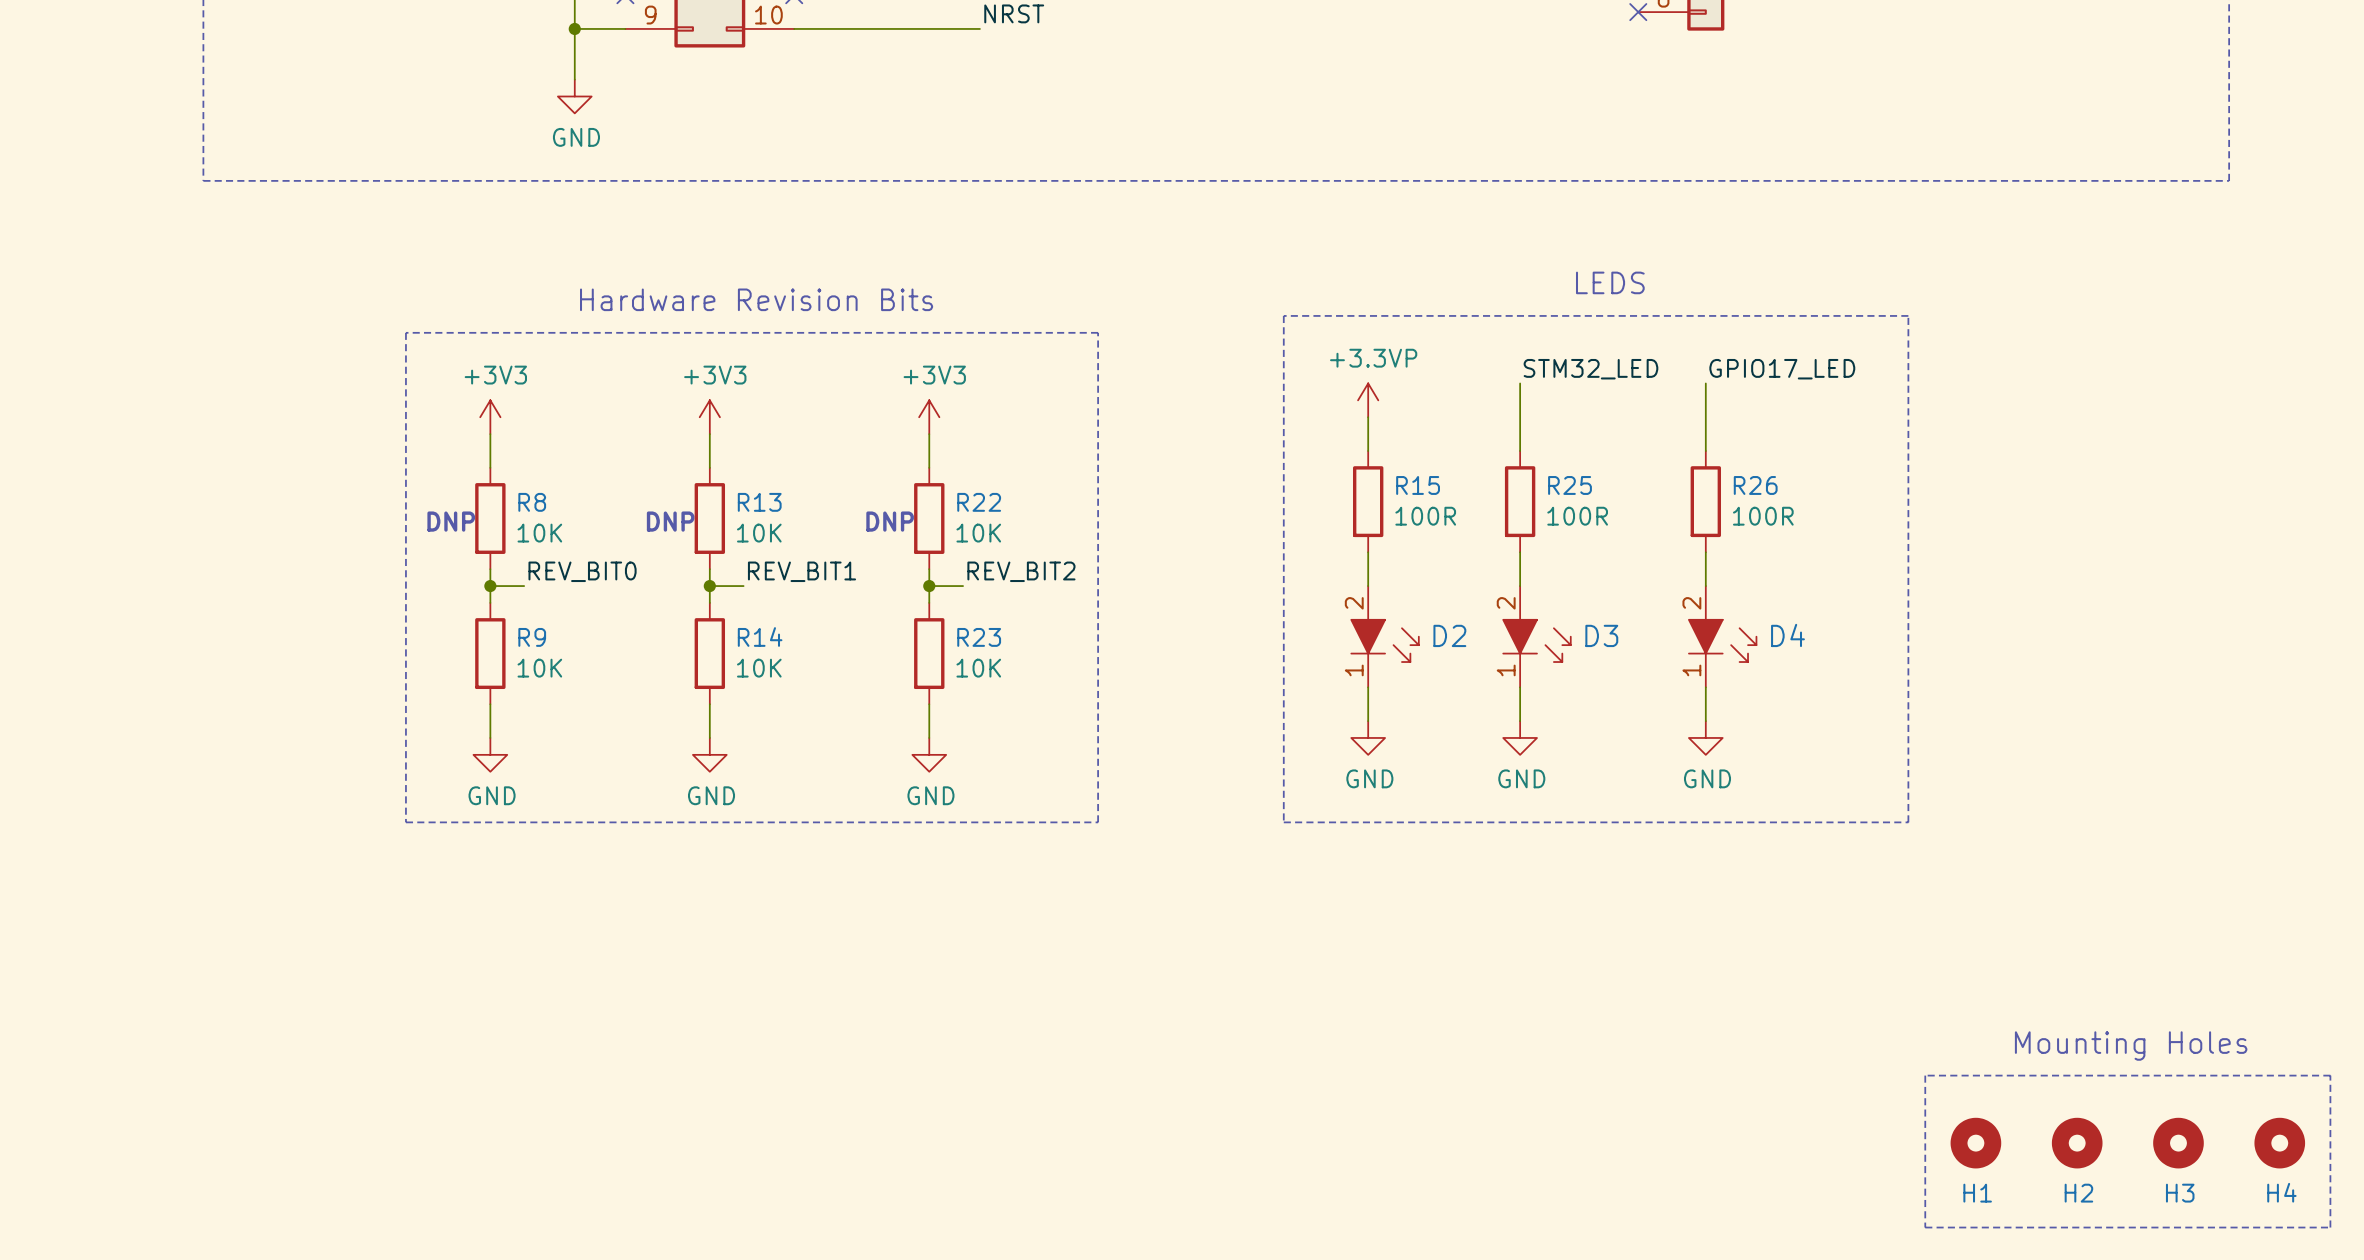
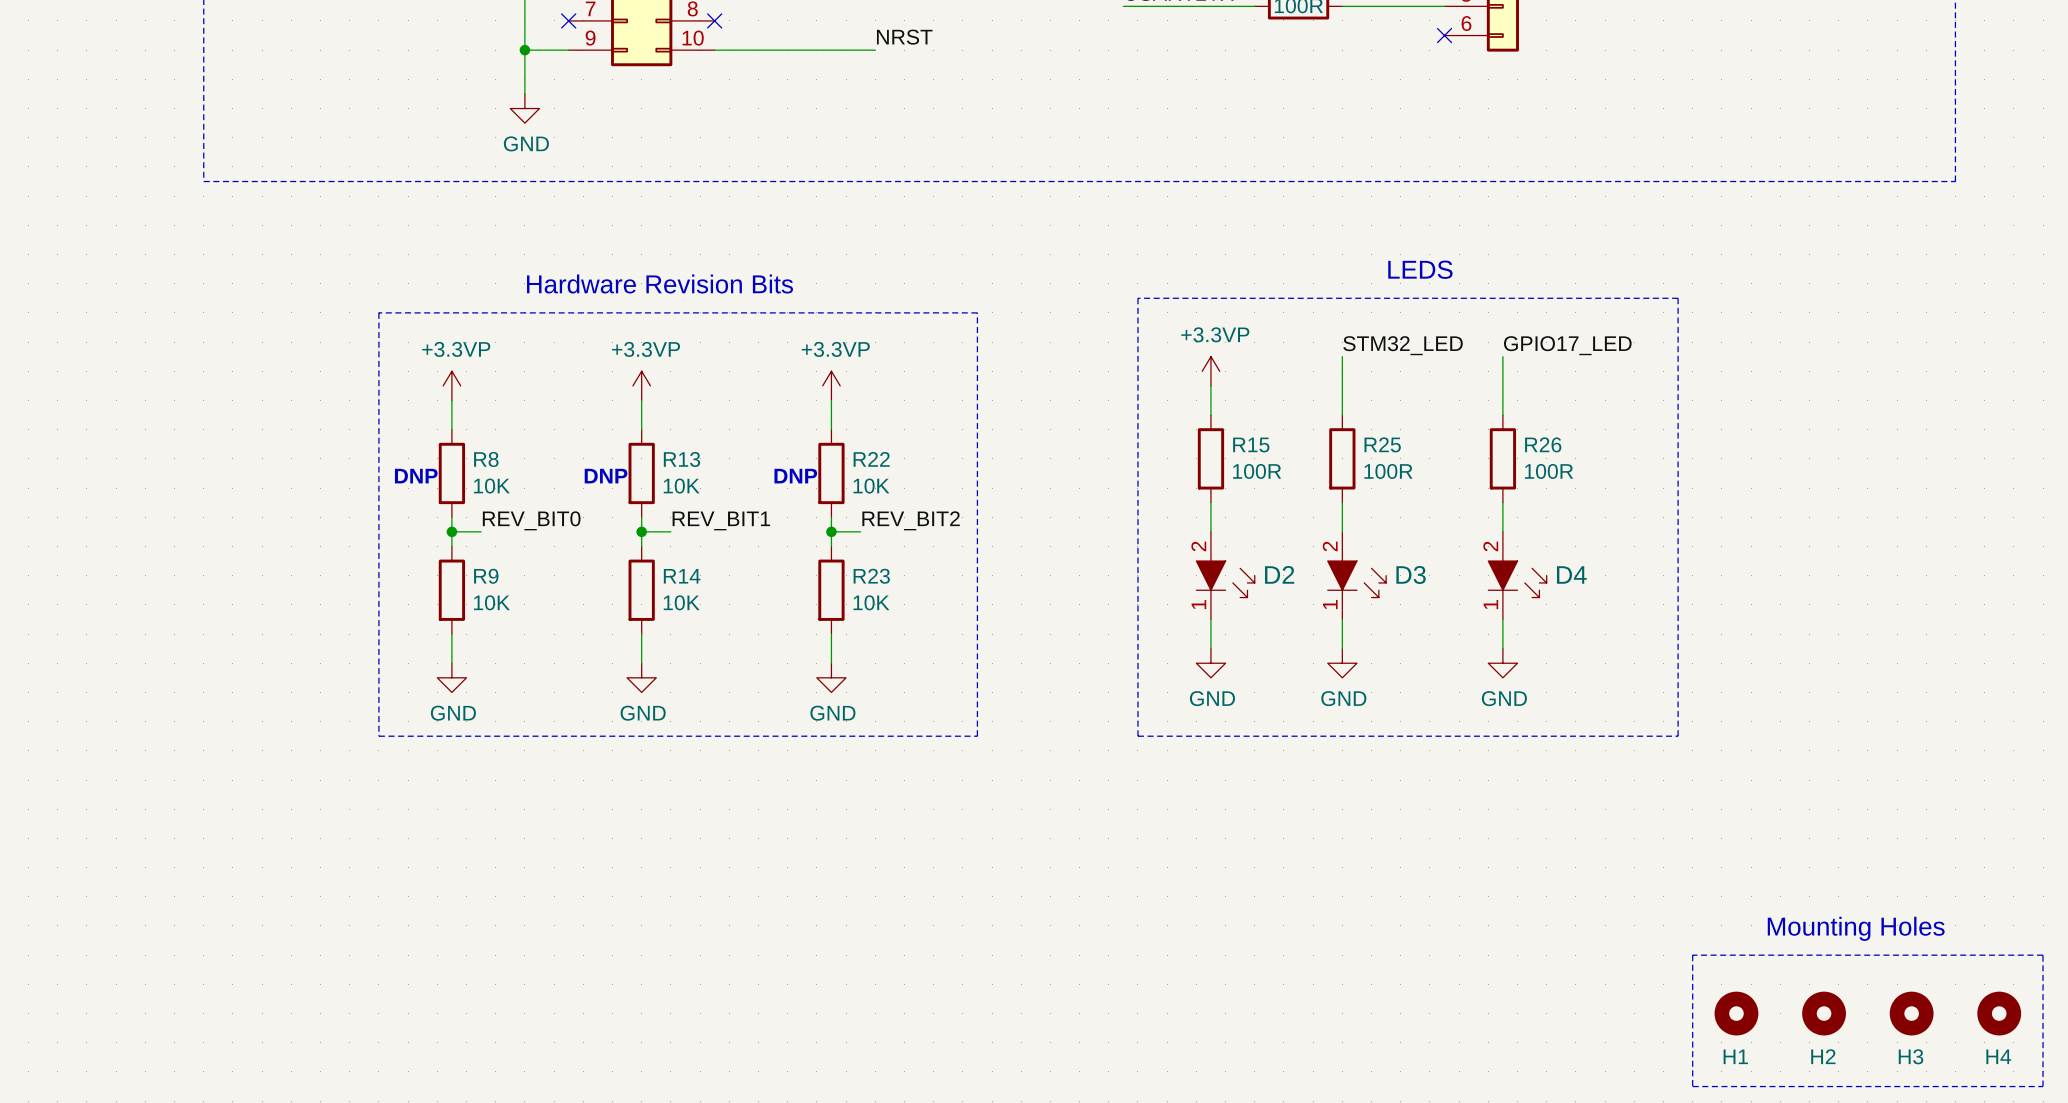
power symbol: +3V3 (490, 417) -> +3.3VP (451, 385)
power symbol: +3V3 (709, 417) -> +3.3VP (641, 385)
power symbol: +3V3 (929, 417) -> +3.3VP (831, 385)

